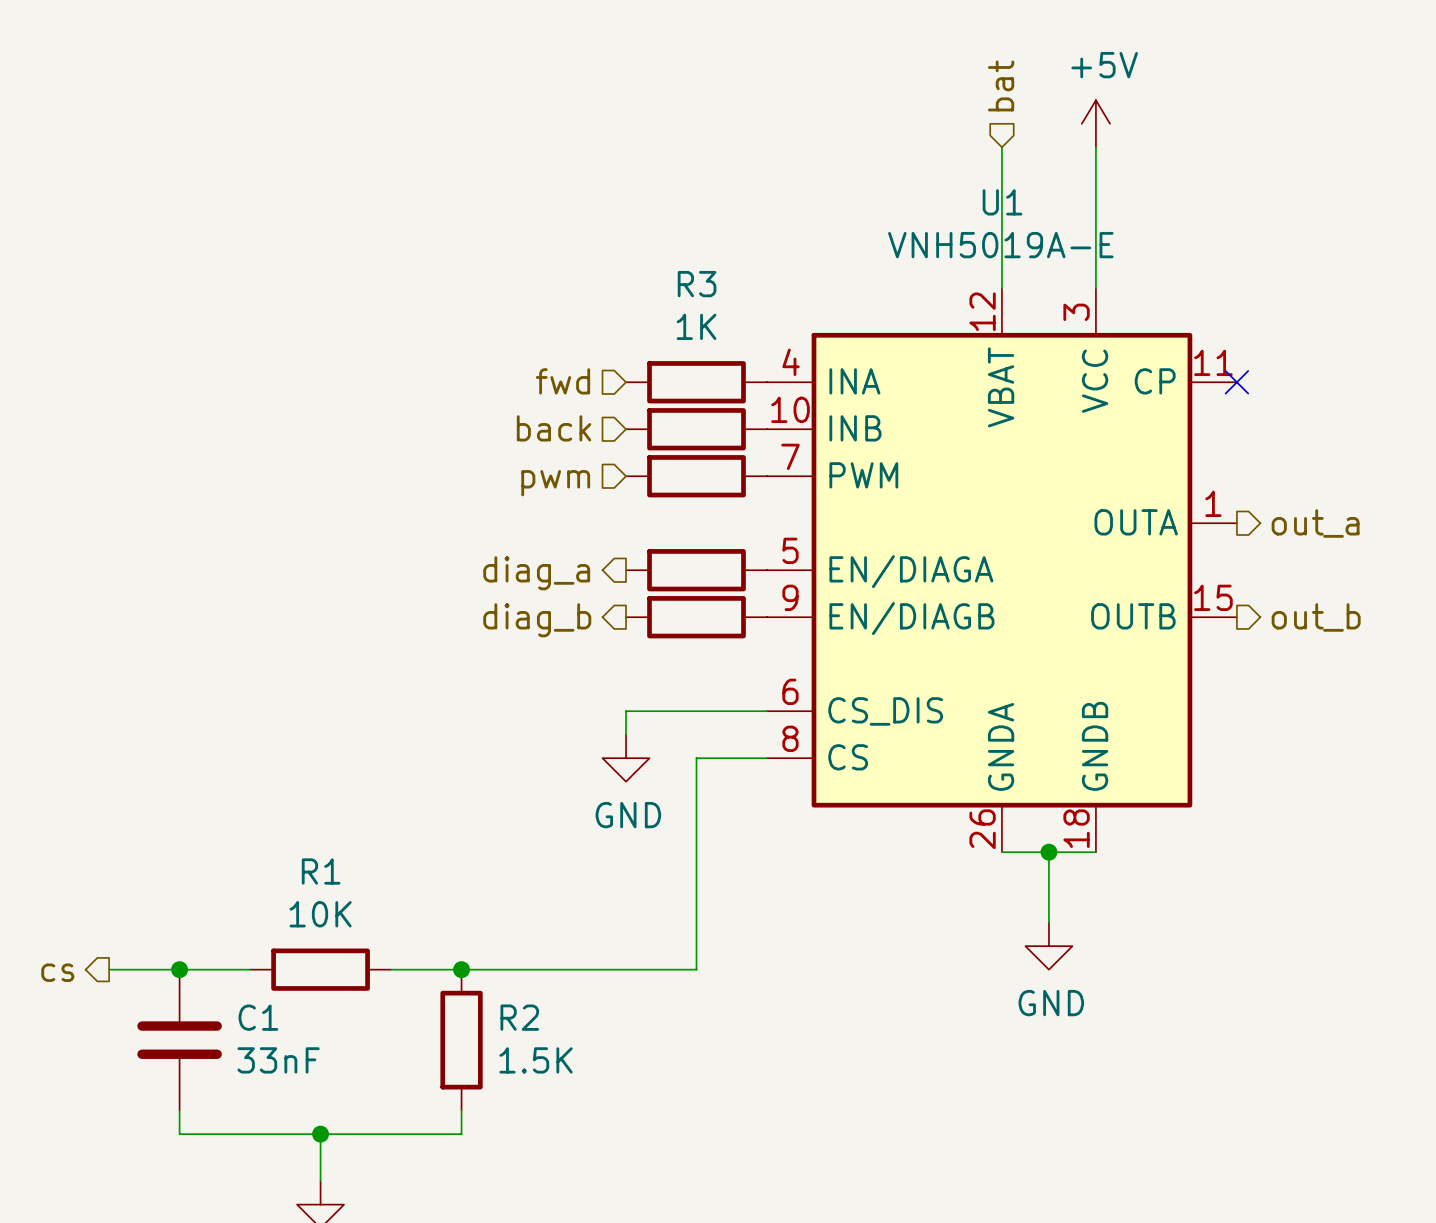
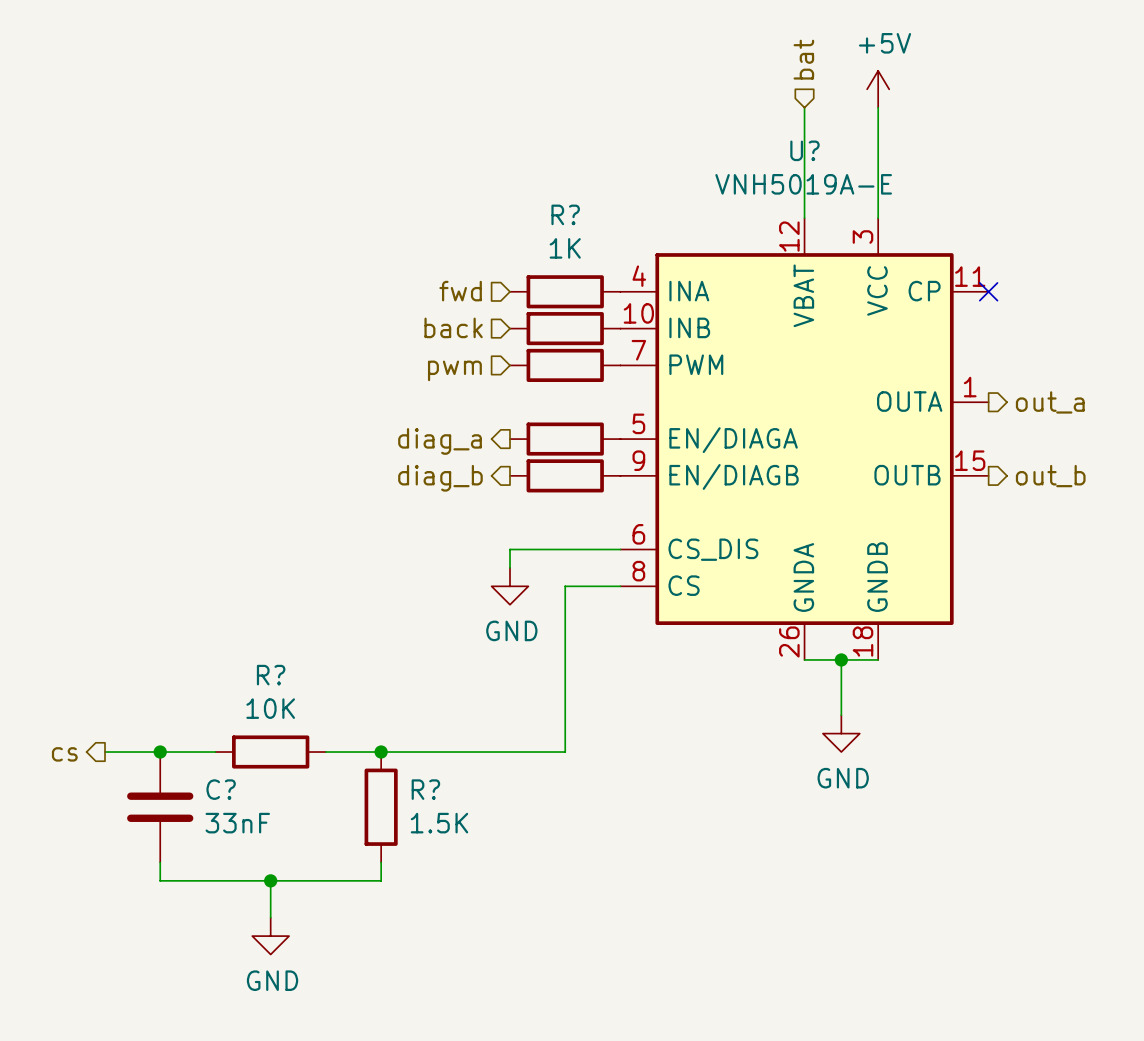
U1 name: U1 (1002, 202) -> U? (804, 150)
R3 name: R3 (697, 284) -> R? (565, 214)
R1 name: R1 (321, 871) -> R? (271, 675)
C1 name: C1 (258, 1017) -> C? (221, 789)
R2 name: R2 (519, 1017) -> R? (425, 789)

